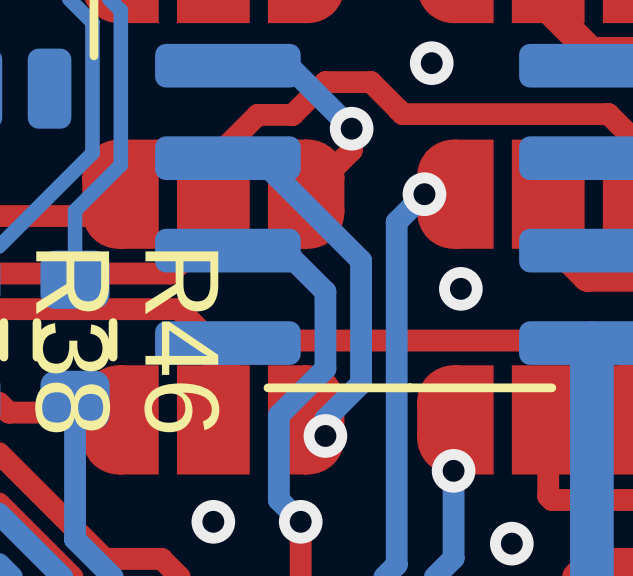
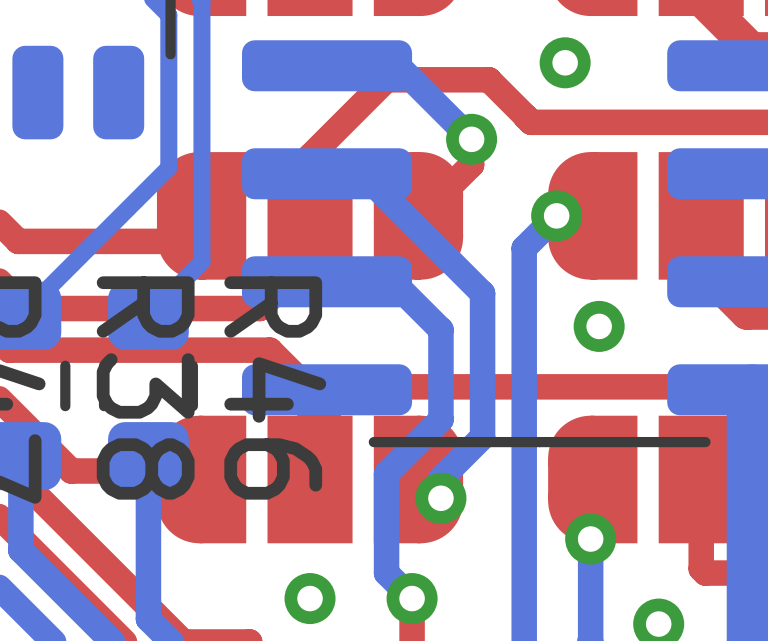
top track: (370, 82) (325, 82) (292, 114) (257, 114) (213, 159) -> (494, 84) (488, 79) (386, 79) (310, 156) (310, 175)
bottom track: (120, 164) (75, 210) (75, 279) -> (201, 181) (201, 262) (148, 315)

